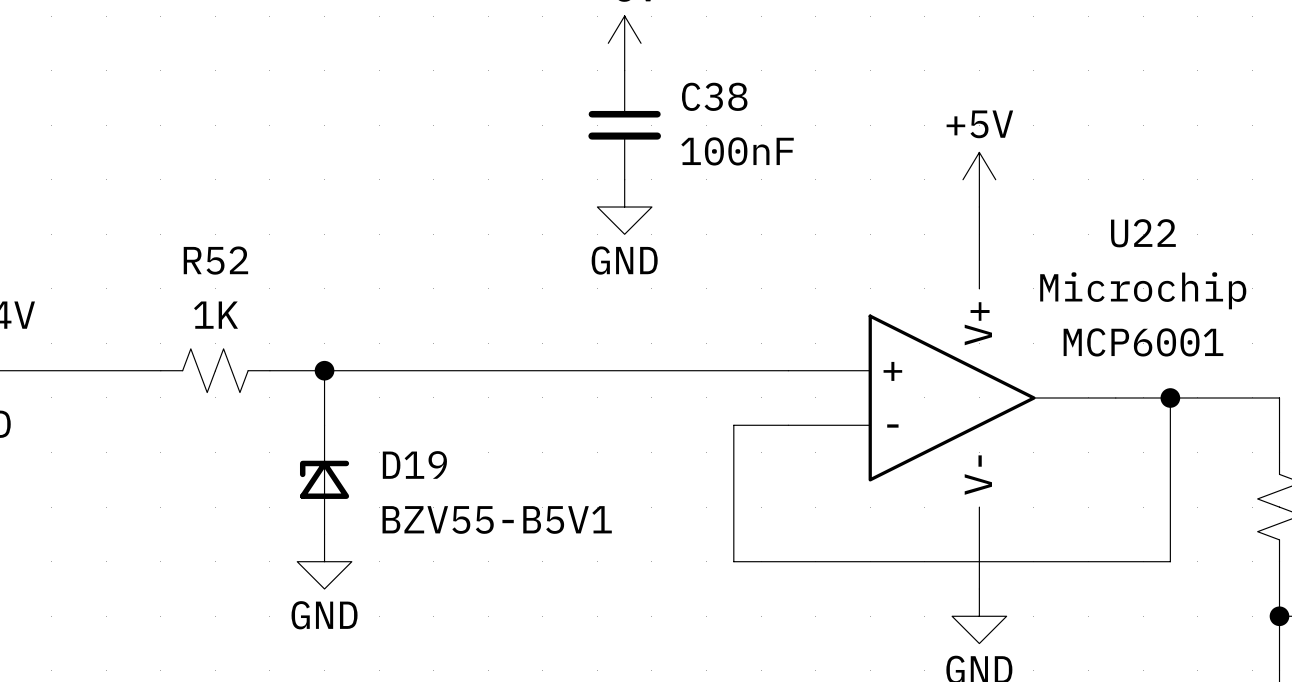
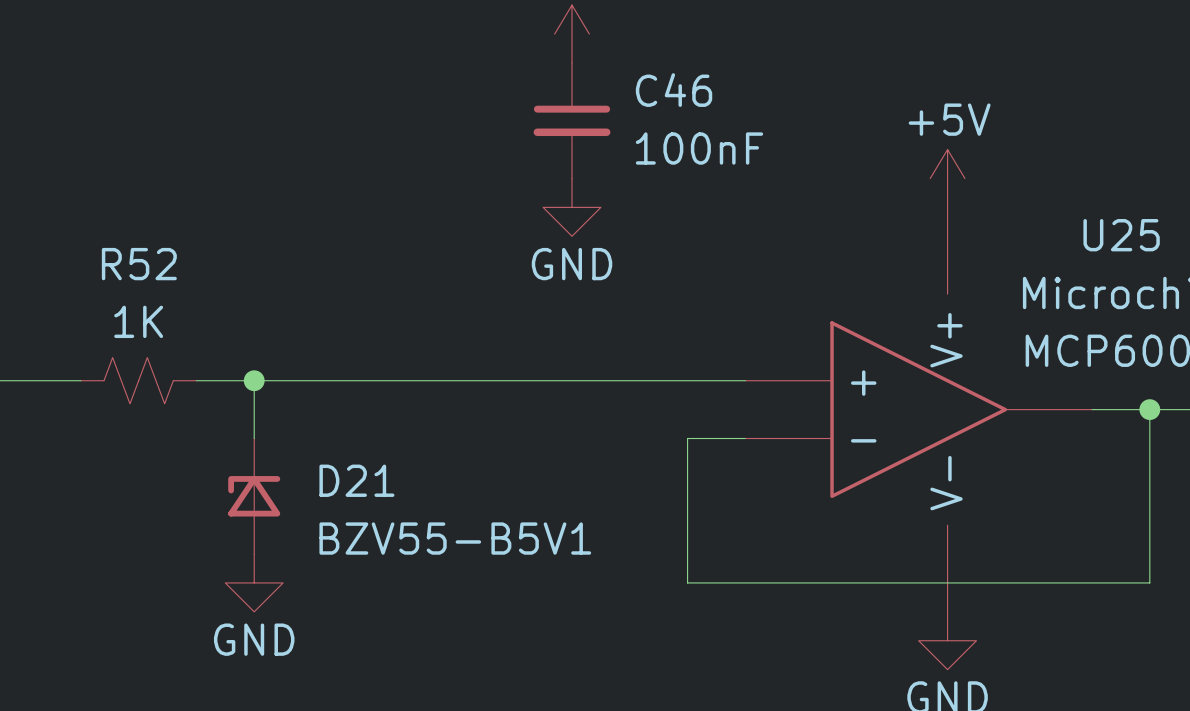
C38 name: C38 (714, 96) -> C46 (674, 90)
U22 name: U22 (1143, 233) -> U25 (1121, 235)
D19 name: D19 (414, 464) -> D21 (356, 480)

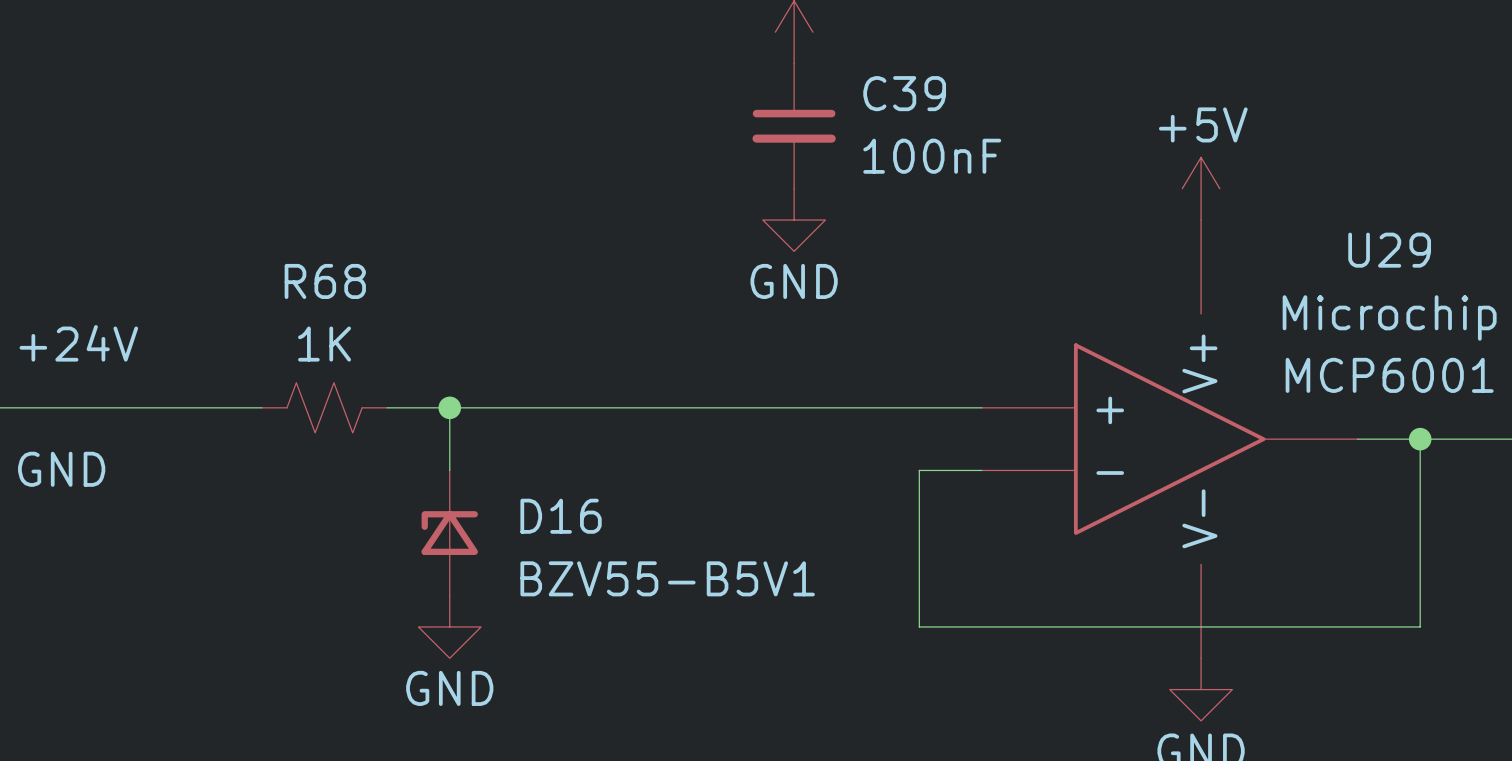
C46 name: C46 (674, 90) -> C39 (904, 93)
U25 name: U25 (1121, 235) -> U29 (1389, 250)
R52 name: R52 (139, 264) -> R68 (325, 281)
D21 name: D21 (356, 480) -> D16 (561, 516)

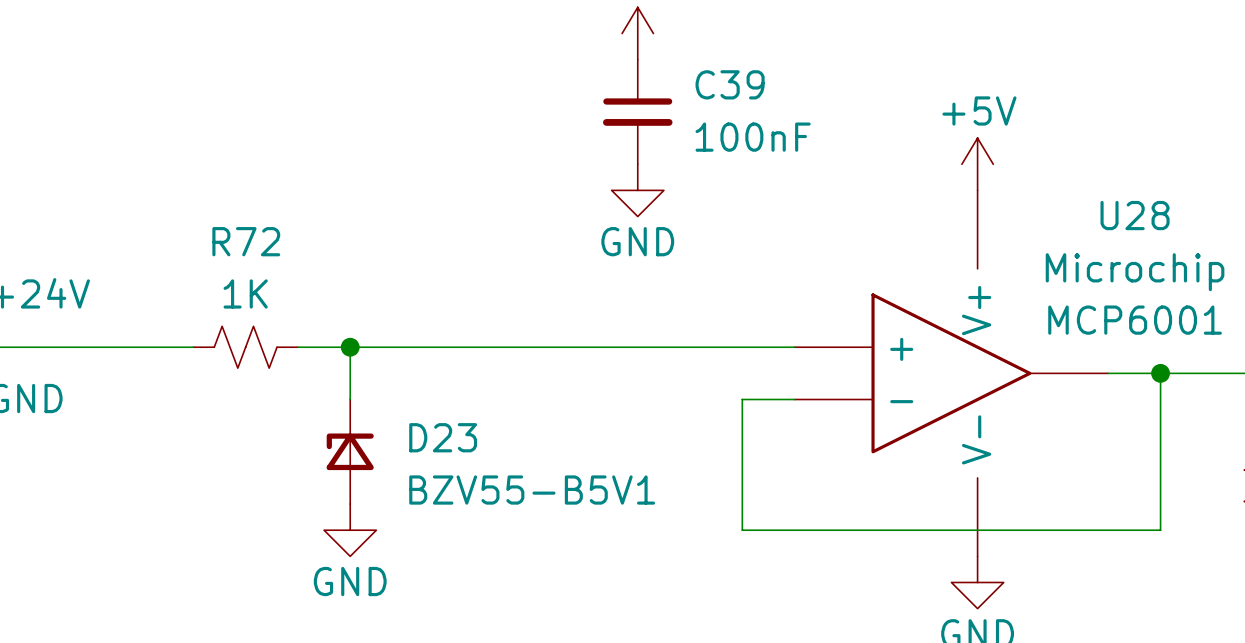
U29 name: U29 (1389, 250) -> U28 (1135, 215)
R68 name: R68 (325, 281) -> R72 (246, 241)
D16 name: D16 (561, 516) -> D23 (443, 437)

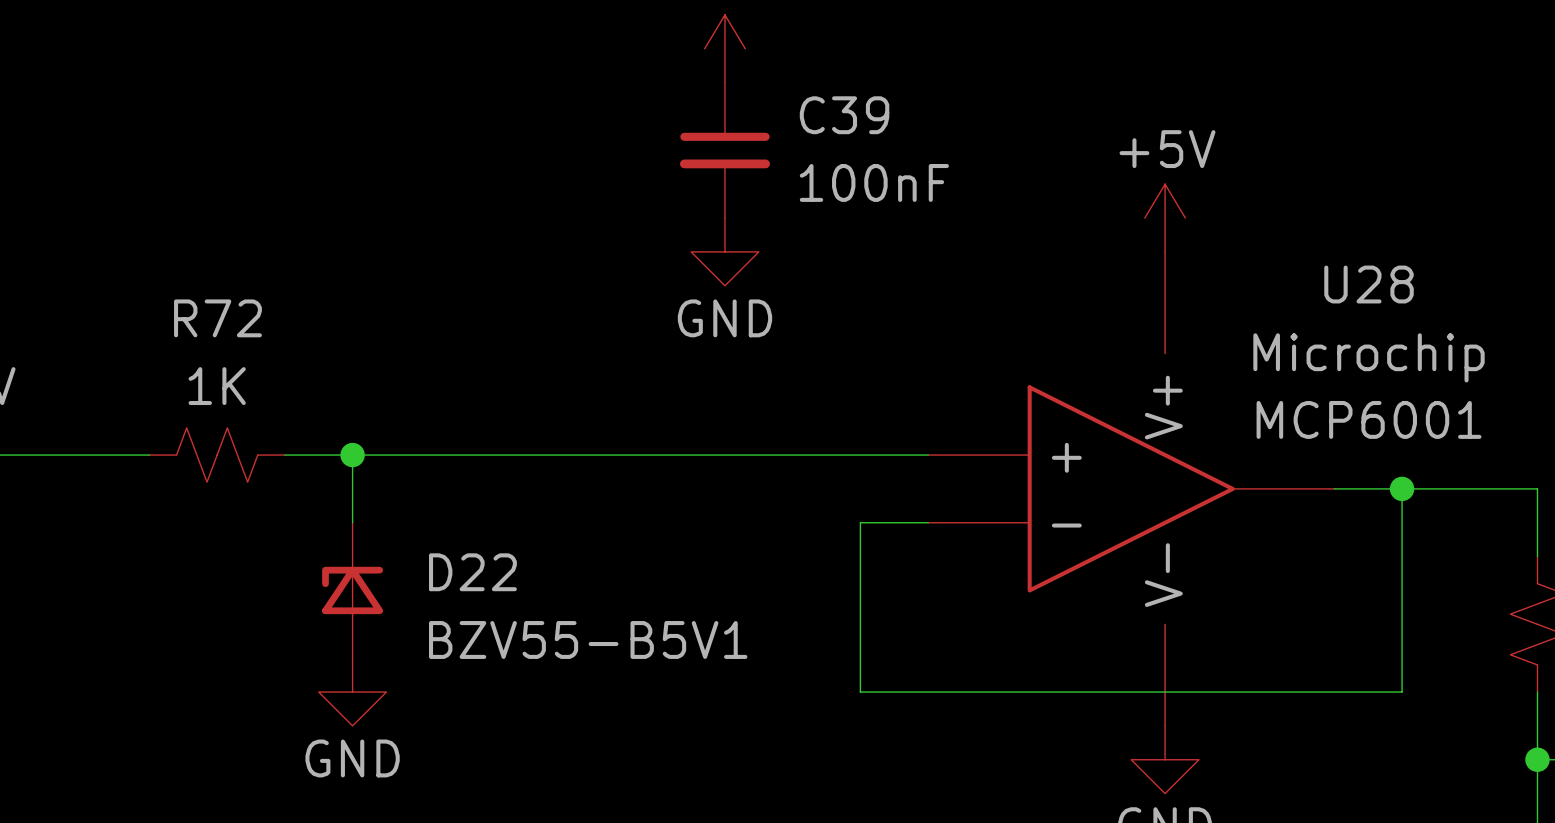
D23 name: D23 (443, 437) -> D22 (472, 572)

